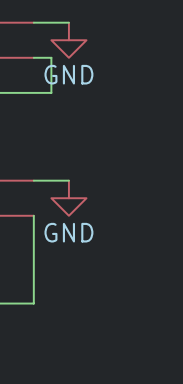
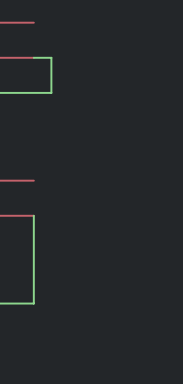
wire: (33, 22) (68, 22) -> none
power symbol: GND (68, 40) -> none
wire: (33, 180) (68, 180) -> none
power symbol: GND (68, 198) -> none

